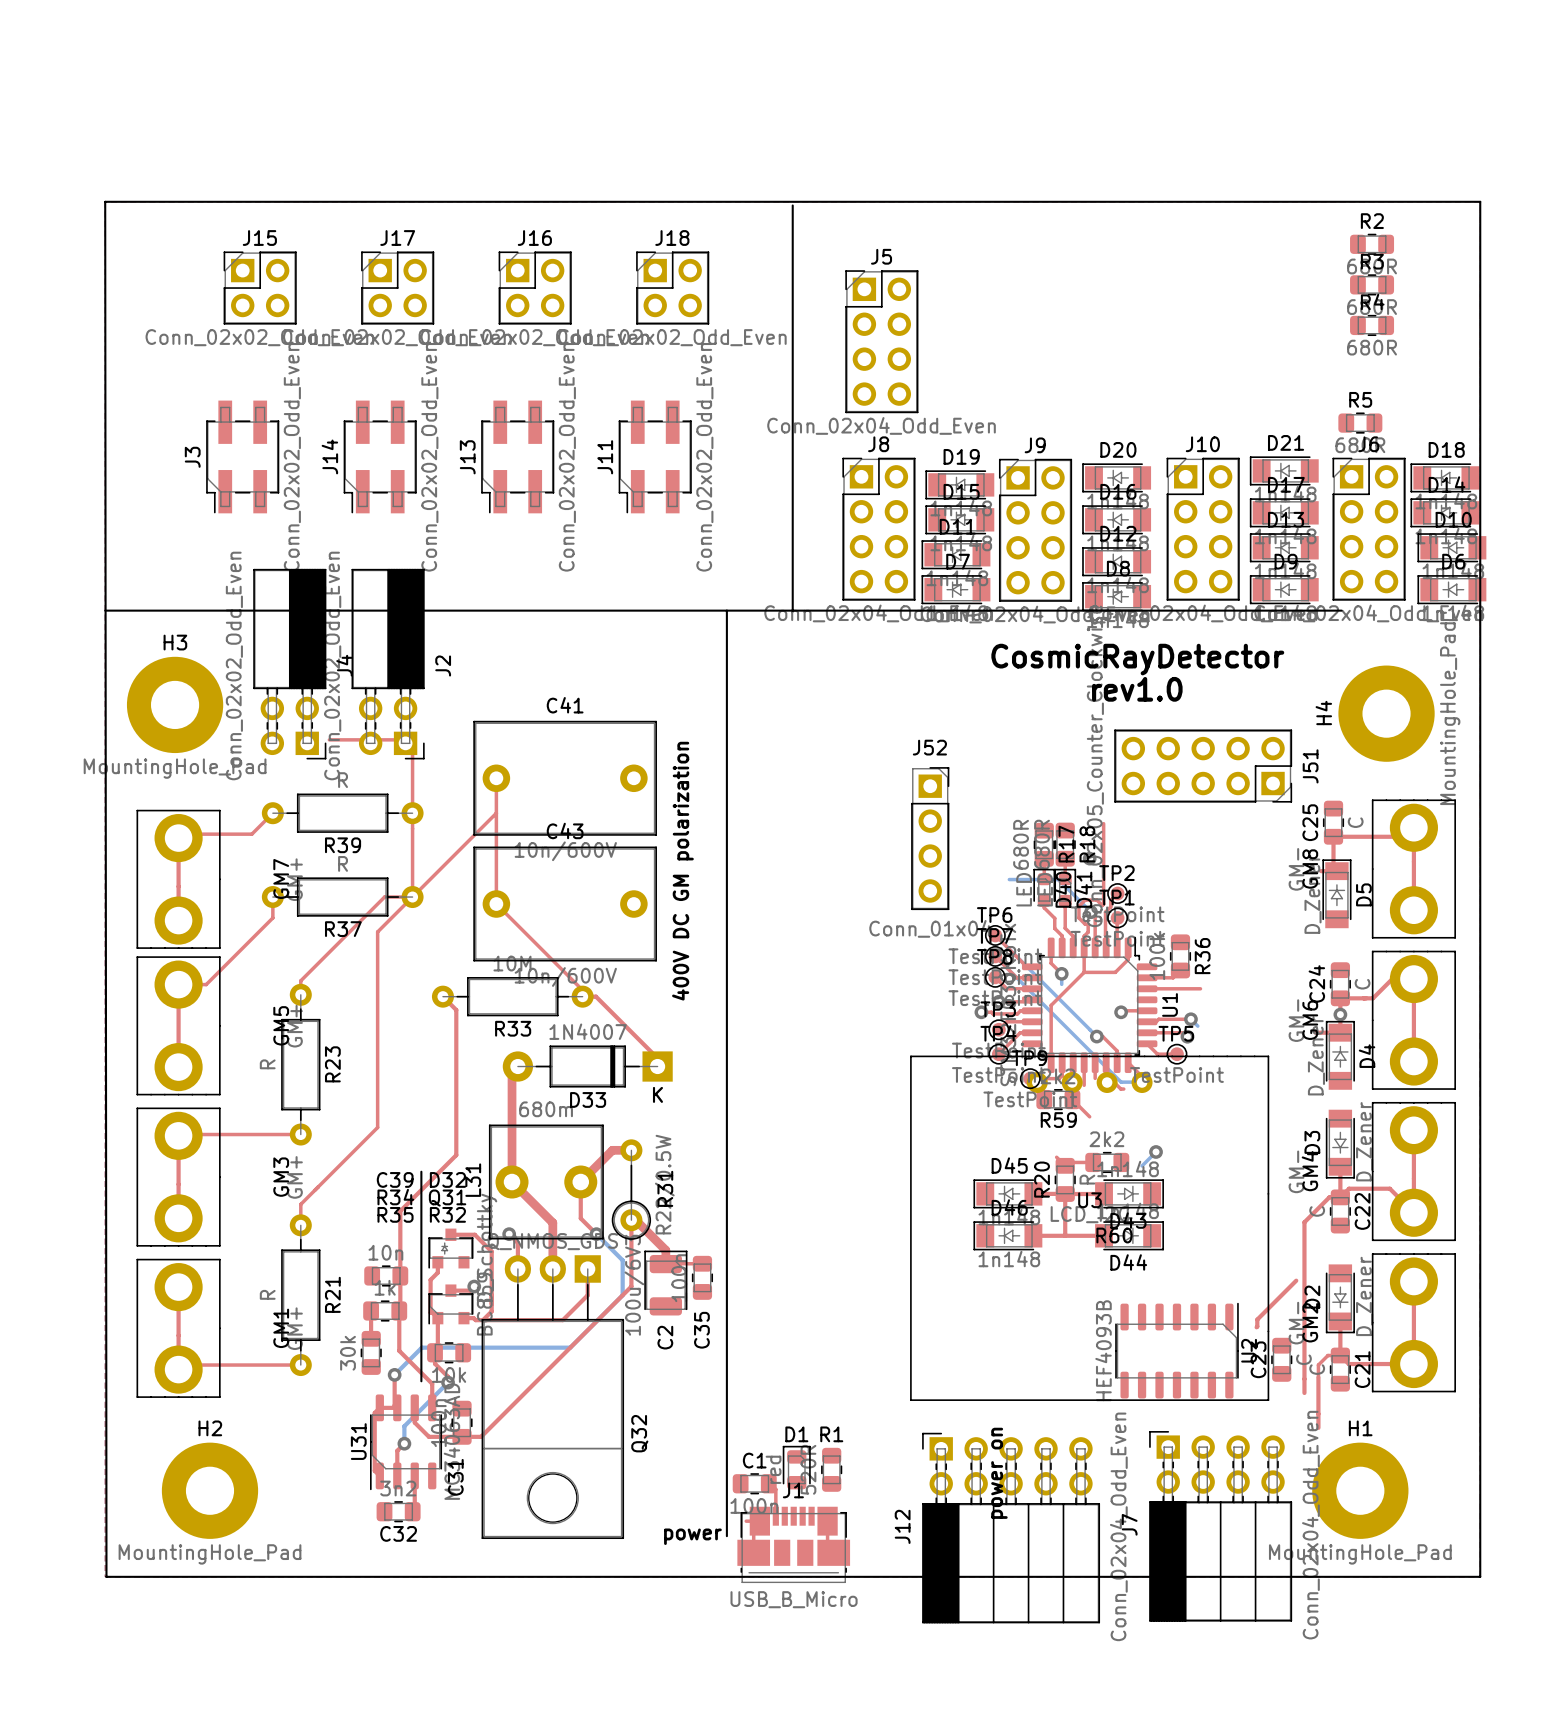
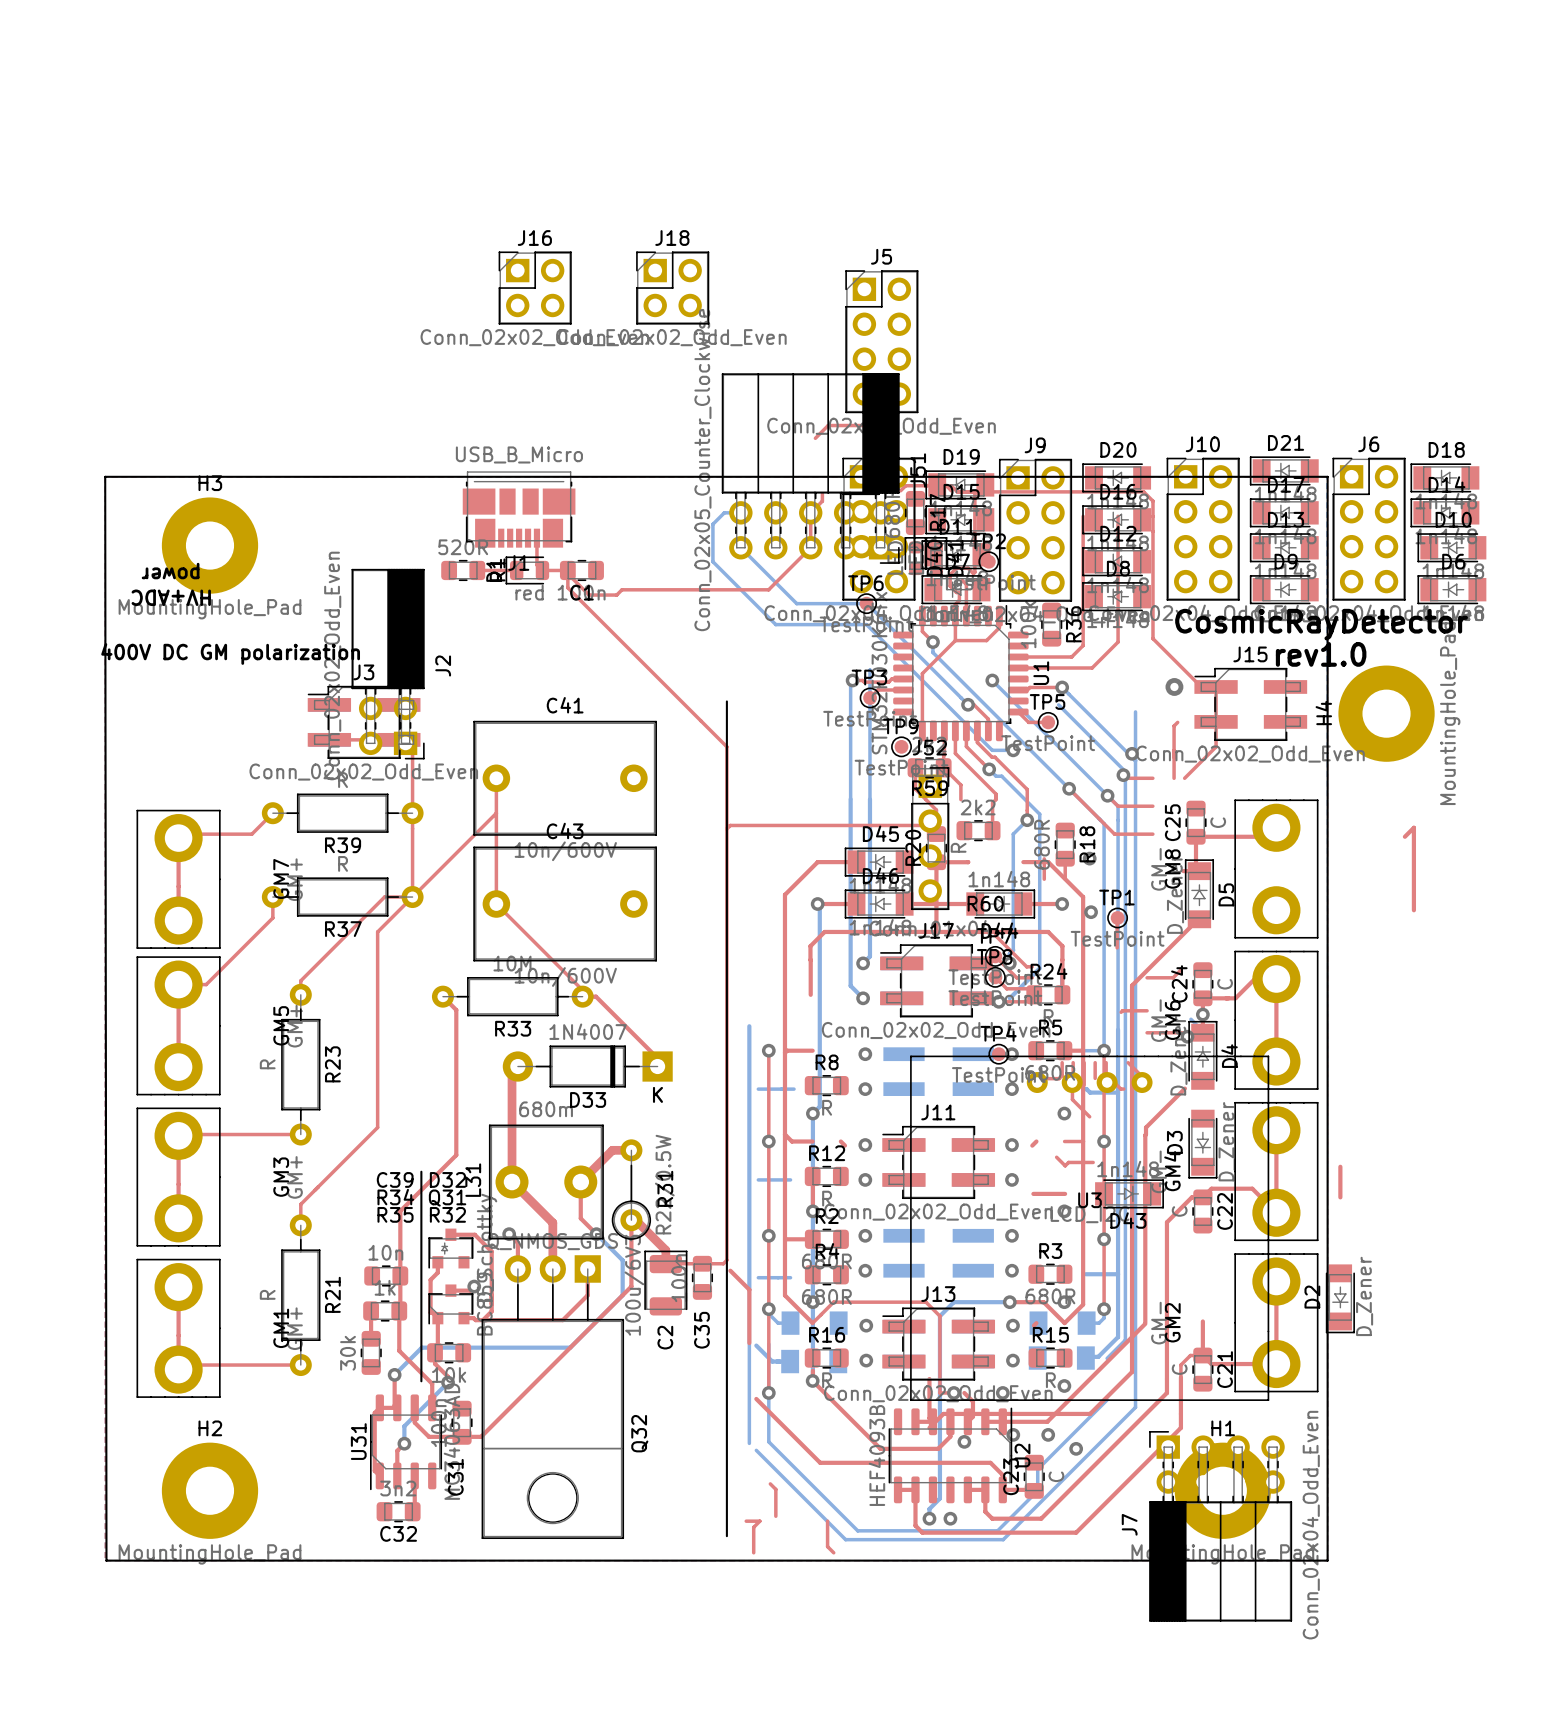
board edge: (105, 201) (1480, 201) (1480, 1576) (106, 1576) (105, 201) -> (105, 476) (106, 1560) (1327, 1560) (1327, 476) (105, 476)
line: (792, 205) (792, 610) -> none
R2 position: (1372, 244) -> (826, 1239)
J15 footprint: [223, 251, 297, 325] -> [1194, 667, 1308, 742]
J17 footprint: [361, 251, 435, 325] -> [880, 944, 993, 1018]
R3 position: (1372, 284) -> (1050, 1274)
R4 position: (1372, 325) -> (826, 1274)
R5 position: (1360, 423) -> (1050, 1050)
top track: none -> (893, 434) (893, 425) (828, 425) (815, 438)
J3 rotation: 0° (242, 456) -> 90° clockwise (364, 722)
J3 position: (242, 456) -> (364, 722)
J14: Conn_02x02_Odd_Even (380, 456) -> none
J13 rotation: 0° (517, 456) -> 90° clockwise (938, 1344)
J13 position: (517, 456) -> (938, 1344)
J11 rotation: 0° (655, 456) -> 90° clockwise (938, 1162)
J11 position: (655, 456) -> (938, 1162)
top track: none -> (900, 490) (905, 485) (946, 485) (951, 490) (951, 485) (957, 491) (1143, 491) (1152, 501) (1152, 638) (1201, 686) (1216, 686) (1216, 746) (1184, 778)
top track: none -> (974, 491) (974, 572) (973, 573) (968, 568) (956, 568) (950, 574) (950, 586) (956, 592) (959, 592) (959, 600) (955, 604) (955, 640)
top track: none -> (822, 494) (822, 501) (810, 512) (810, 547) (768, 589) (621, 589) (616, 595) (589, 595) (567, 573)
bottom track: none -> (740, 512) (724, 512) (712, 524) (712, 561) (775, 624) (866, 624) (992, 750) (1013, 750)
top track: none -> (1083, 516) (1083, 645) (1071, 657) (1018, 657)
top track: none -> (1118, 516) (1118, 642) (1092, 668) (1018, 668)
top track: none -> (536, 538) (536, 564) (542, 570) (567, 570) (567, 587) (726, 746) (726, 1260) (723, 1263) (702, 1263)
bottom track: none -> (740, 547) (796, 603) (866, 603) (968, 704)
top track: none -> (477, 570) (516, 570)
text: none -> power (170, 571)
top track: none -> (962, 580) (966, 584) (966, 616)
text: none -> HV+ADC (171, 597)
line: (105, 610) (1341, 610) -> none
line: (726, 610) (726, 701) -> none
top track: none -> (922, 616) (922, 631) (932, 642)
top track: none -> (999, 616) (999, 627) (986, 640) (955, 640)
top track: none -> (955, 640) (922, 673) (922, 730)
bottom track: none -> (932, 642) (932, 652) (1104, 823) (1104, 1050) (1083, 1050)
via: none -> (932, 642)
text: none -> 400V DC GM polarization (230, 653)
text position: CosmicRayDetector (1137, 659) -> CosmicRayDetector (1321, 624)
J4: Conn_02x02_Odd_Even (289, 664) -> none
bottom track: none -> (869, 670) (869, 956) (863, 963)
top track: none -> (903, 679) (891, 679) (888, 682) (852, 680)
bottom track: none -> (852, 680) (850, 682) (850, 985) (863, 998)
via: none -> (852, 680)
bottom track: none -> (992, 680) (1118, 806) (1118, 1337) (1098, 1356) (1085, 1358)
via: none -> (992, 680)
via: none -> (1174, 686)
top track: none -> (1062, 687) (1029, 687) (1027, 690) (1018, 690)
bottom track: none -> (1062, 687) (1135, 760)
via: none -> (1062, 687)
text position: rev1.0 (1137, 689) -> rev1.0 (1321, 654)
top track: none -> (903, 690) (878, 690) (870, 697)
H3 position: (175, 704) -> (209, 545)
top track: none -> (968, 704) (973, 704) (988, 719) (988, 730)
via: none -> (968, 704)
bottom track: none -> (1058, 704) (1125, 771) (1125, 1340) (1107, 1358)
bottom track: none -> (1135, 711) (1135, 1407) (1003, 1539) (845, 1539) (756, 1450)
top track: none -> (1018, 712) (1028, 722) (1048, 722)
top track: none -> (1177, 722) (1174, 726) (1174, 778)
J51 footprint: [1114, 729, 1293, 803] -> [721, 373, 900, 564]
top track: none -> (944, 730) (943, 767) (960, 785) (960, 799)
top track: none -> (955, 730) (955, 753) (995, 793) (995, 799) (992, 802) (992, 830)
top track: none -> (966, 730) (966, 746) (989, 769)
top track: none -> (977, 730) (977, 742) (1027, 789) (1027, 820)
via: none -> (1013, 750)
via: none -> (1132, 753)
top track: none -> (915, 767) (915, 789) (936, 810) (936, 834) (927, 825) (730, 825) (726, 828)
bottom track: none -> (989, 769) (996, 776) (1001, 776) (1039, 814) (1039, 968) (1009, 998)
via: none -> (989, 769)
top track: none -> (1123, 775) (1126, 778) (1152, 778)
via: none -> (1123, 775)
top track: none -> (1069, 788) (1114, 834) (1152, 834)
via: none -> (1069, 788)
top track: none -> (1107, 795) (1118, 806) (1152, 806)
via: none -> (1107, 795)
bottom track: none -> (1027, 820) (1013, 834) (1013, 950) (1009, 953) (1009, 963)
via: none -> (1027, 820)
C25 position: (1333, 822) -> (1196, 822)
top track: (1103, 823) (1103, 904) (1102, 905) (1096, 900) (1085, 900) (1078, 906) (1078, 917) (1085, 924) (1088, 924) (1088, 932) (1084, 936) (1084, 972) -> none
top track: (1397, 836) (1333, 836) (1333, 867) (1336, 871) (1321, 871) -> (1260, 836) (1196, 836) (1196, 867) (1199, 871) (1183, 871)
R17 position: (1044, 844) -> (915, 512)
top track: none -> (856, 862) (817, 862) (784, 894) (784, 1295) (812, 1323) (833, 1302) (925, 1302) (939, 1316) (939, 1392) (953, 1392)
top track: none -> (968, 862) (936, 862) (936, 931)
top track: none -> (1023, 862) (1048, 862) (1083, 897) (1083, 1304) (1064, 1323) (1043, 1302) (1009, 1302)
GM8 position: (1413, 869) -> (1276, 869)
text: 400V DC GM polarization (682, 871) -> none
bottom track: (1009, 879) (1058, 879) (1093, 914) -> none
D40 position: (1044, 887) -> (915, 556)
D41 position: (1065, 887) -> (936, 556)
top track: (1117, 893) (1110, 900) (1110, 906) (1105, 912) (1106, 947) -> none
TP2 position: (1117, 893) -> (988, 561)
D5 position: (1336, 893) -> (1199, 893)
top track: (1044, 900) (1044, 907) (1054, 918) (1054, 928) (1062, 935) (1062, 947) -> none
top track: (1065, 900) (1065, 928) (1073, 936) (1073, 947) -> none
top track: none -> (817, 904) (856, 904)
bottom track: none -> (817, 904) (819, 906) (819, 1106) (812, 1113) (812, 1380)
via: none -> (817, 904)
top track: none -> (904, 904) (968, 904)
top track: none -> (1023, 904) (1062, 904)
via: none -> (1062, 904)
top track: (1091, 912) (1095, 916) (1095, 947) -> none
top track: none -> (1190, 927) (1132, 985) (1132, 1372) (1090, 1413) (943, 1413) (929, 1427)
bottom track: (995, 935) (1096, 1036) -> none
TP6 position: (995, 935) -> (866, 603)
top track: (1051, 947) (1051, 963) (1061, 973) -> none
top track: (1128, 947) (1128, 959) (1115, 972) (1084, 972) -> none
bottom track: (995, 956) (1121, 1082) (1142, 1082) -> none
R36 position: (1180, 956) -> (1051, 624)
via: none -> (863, 963)
via: none -> (1009, 963)
top track: (1084, 972) (1051, 1005) (1051, 1062) -> none
via: (1061, 973) -> none
C24 position: (1340, 984) -> (1202, 984)
top track: (1147, 988) (1200, 988) -> none
top track: none -> (810, 994) (810, 946) (824, 931) (1048, 931) (1062, 946) (1062, 994)
R24: none -> R (1048, 994)
via: none -> (863, 998)
U1 position: (1089, 1004) -> (960, 673)
top track: (1032, 1010) (1020, 1010) (1017, 1013) (981, 1012) -> none
via: (981, 1012) -> none
via: (1121, 1012) -> none
via: (1340, 1014) -> none
top track: (1190, 1019) (1158, 1019) (1156, 1021) (1147, 1021) -> none
via position: (1190, 1019) -> (1202, 1014)
GM6 position: (1413, 1020) -> (1276, 1020)
top track: (1032, 1021) (1006, 1021) (998, 1029) -> none
bottom track: none -> (749, 1026) (749, 1443)
TP3 position: (998, 1029) -> (870, 697)
top track: (1032, 1032) (1020, 1032) (998, 1054) -> none
top track: none -> (1202, 1032) (1202, 998) (1235, 998) (1254, 979) (1276, 979) (1276, 1061)
top track: (1315, 1032) (1340, 1032) (1340, 998) (1372, 998) (1392, 979) (1413, 979) (1413, 1061) -> none
top track: (1096, 1036) (1102, 1036) (1117, 1051) (1117, 1062) -> none
via position: (1096, 1036) -> (1104, 1050)
top track: (1147, 1043) (1157, 1054) (1176, 1054) -> none
top track: none -> (768, 1050) (768, 1392)
via: none -> (768, 1050)
top track: none -> (812, 1050) (787, 1050) (784, 1052)
top track: none -> (1064, 1050) (1083, 1050)
top track: none -> (1104, 1050) (1104, 1309)
via: none -> (865, 1054)
via: none -> (1011, 1054)
TP5 position: (1176, 1054) -> (1048, 722)
D4 position: (1340, 1055) -> (1202, 1055)
part: none -> (938, 1071)
TP9 position: (1030, 1078) -> (901, 746)
R8: none -> R (826, 1085)
top track: none -> (1184, 1088) (1146, 1127) (1145, 1322)
bottom track: none -> (758, 1089) (794, 1089)
via: none -> (865, 1089)
via: none -> (1011, 1089)
bottom track: none -> (1083, 1089) (1086, 1089) (1090, 1092) (1118, 1092)
R59 position: (1058, 1099) -> (929, 767)
via: none -> (812, 1113)
via: none -> (1064, 1113)
top track: none -> (1276, 1130) (1276, 1212) (1252, 1188) (1211, 1188) (1202, 1197) (1191, 1197) (1166, 1222) (1166, 1392) (1041, 1518) (992, 1518) (985, 1511) (985, 1489) (967, 1489)
top track: (1413, 1130) (1413, 1212) (1389, 1188) (1349, 1188) (1340, 1197) (1329, 1197) (1304, 1222) (1304, 1392) -> none
top track: none -> (784, 1134) (791, 1141) (812, 1141)
via: none -> (768, 1141)
top track: none -> (840, 1141) (844, 1145)
top track: none -> (1036, 1141) (1032, 1145)
top track: none -> (1064, 1141) (1083, 1141)
via: none -> (1104, 1141)
D3 position: (1340, 1144) -> (1202, 1144)
via: none -> (865, 1145)
via: none -> (1011, 1145)
bottom track: (1156, 1151) (1142, 1165) -> none
via: (1156, 1151) -> none
R60 position: (1107, 1162) -> (978, 830)
GM4 position: (1413, 1171) -> (1276, 1171)
top track: none -> (812, 1176) (812, 1211)
R12: none -> R (826, 1176)
bottom track: none -> (758, 1179) (790, 1179)
via: none -> (865, 1179)
via: none -> (1011, 1179)
R20 position: (1065, 1179) -> (936, 848)
D45 position: (1007, 1193) -> (879, 862)
top track: (1096, 1194) (1065, 1194) (1065, 1235) -> none
via: none -> (812, 1211)
via: none -> (1064, 1211)
C22 position: (1340, 1211) -> (1202, 1211)
via: none -> (768, 1235)
via: none -> (865, 1235)
D46 position: (1007, 1235) -> (879, 904)
via: none -> (1011, 1235)
top track: (1033, 1235) (1097, 1235) -> none
D44 position: (1129, 1235) -> (1000, 904)
top track: none -> (784, 1239) (812, 1239)
via: none -> (1104, 1239)
part: none -> (938, 1253)
top track: none -> (730, 1270) (749, 1289) (749, 1343)
via: none -> (865, 1270)
via: none -> (1011, 1270)
bottom track: none -> (1085, 1274) (1118, 1274)
bottom track: none -> (758, 1277) (790, 1277)
top track: (1296, 1280) (1257, 1319) (1256, 1327) -> none
top track: (1413, 1281) (1413, 1364) -> (1276, 1281) (1276, 1364)
via: none -> (812, 1302)
bottom track: none -> (1009, 1302) (953, 1302) (939, 1316) (939, 1498) (929, 1508) (929, 1518)
via: none -> (1009, 1302)
via: none -> (1064, 1302)
bottom track: none -> (768, 1309) (768, 1313) (778, 1323) (790, 1323)
via: none -> (768, 1309)
bottom track: none -> (1104, 1309) (1104, 1318) (1099, 1323) (1086, 1323)
via: none -> (1104, 1309)
top track: (1340, 1321) (1340, 1355) -> (1202, 1321) (1202, 1355)
GM2 position: (1413, 1322) -> (1276, 1322)
part: none -> (814, 1323)
top track: none -> (1036, 1323) (1033, 1325)
part: none -> (1062, 1323)
top track: none -> (1145, 1323) (1047, 1421) (985, 1421)
via: none -> (866, 1325)
via: none -> (1012, 1325)
bottom track: none -> (768, 1344) (768, 1441) (857, 1530) (997, 1530) (1037, 1490) (1037, 1469) (1107, 1399)
bottom track: none -> (756, 1345) (772, 1361) (790, 1361) (790, 1364)
U2 position: (1176, 1350) -> (950, 1455)
top track: none -> (1202, 1355) (1190, 1355) (1180, 1365) (1180, 1427) (1076, 1532) (922, 1532) (915, 1525) (915, 1489) (898, 1489)
top track: (1340, 1355) (1348, 1364) (1406, 1364) -> (1202, 1355) (1211, 1364) (1269, 1364)
top track: (1340, 1355) (1327, 1355) (1318, 1365) (1318, 1427) -> none
R16: none -> R (826, 1358)
R15: none -> R (1050, 1358)
part: none -> (1061, 1358)
C23 position: (1281, 1359) -> (1034, 1476)
via: none -> (866, 1360)
via: none -> (1012, 1360)
part: none -> (814, 1361)
C21 position: (1340, 1369) -> (1202, 1369)
top track: none -> (812, 1370) (812, 1381) (880, 1448) (938, 1448) (950, 1436) (950, 1421)
top track: none -> (929, 1379) (929, 1418) (932, 1421) (915, 1421)
via: none -> (812, 1380)
via: none -> (1064, 1385)
via: none -> (768, 1392)
via: none -> (953, 1392)
top track: none -> (964, 1392) (972, 1401) (972, 1416) (967, 1421)
via: none -> (1002, 1392)
top track: none -> (756, 1398) (820, 1462) (990, 1462) (1002, 1475) (1002, 1489) (1034, 1490)
via: none -> (1013, 1434)
via: none -> (1048, 1434)
via: none -> (964, 1441)
via: none -> (1076, 1448)
C1 name position: C1 (754, 1460) -> C1 (581, 592)
D1 rotation: 0° (796, 1467) -> 90° counterclockwise (527, 570)
D1 position: (796, 1467) -> (527, 570)
R1 rotation: 0° (831, 1469) -> 90° clockwise (463, 570)
R1 position: (831, 1469) -> (463, 570)
text: power on (999, 1473) -> none
C1 position: (754, 1483) -> (581, 570)
H1 position: (1360, 1490) -> (1222, 1490)
via: none -> (929, 1518)
via: none -> (950, 1518)
J12: Conn_02x04_Odd_Even (1011, 1528) -> none
text: power (692, 1536) -> none
J1 rotation: 0° (793, 1544) -> 180° (519, 509)
J1 position: (793, 1544) -> (519, 509)

